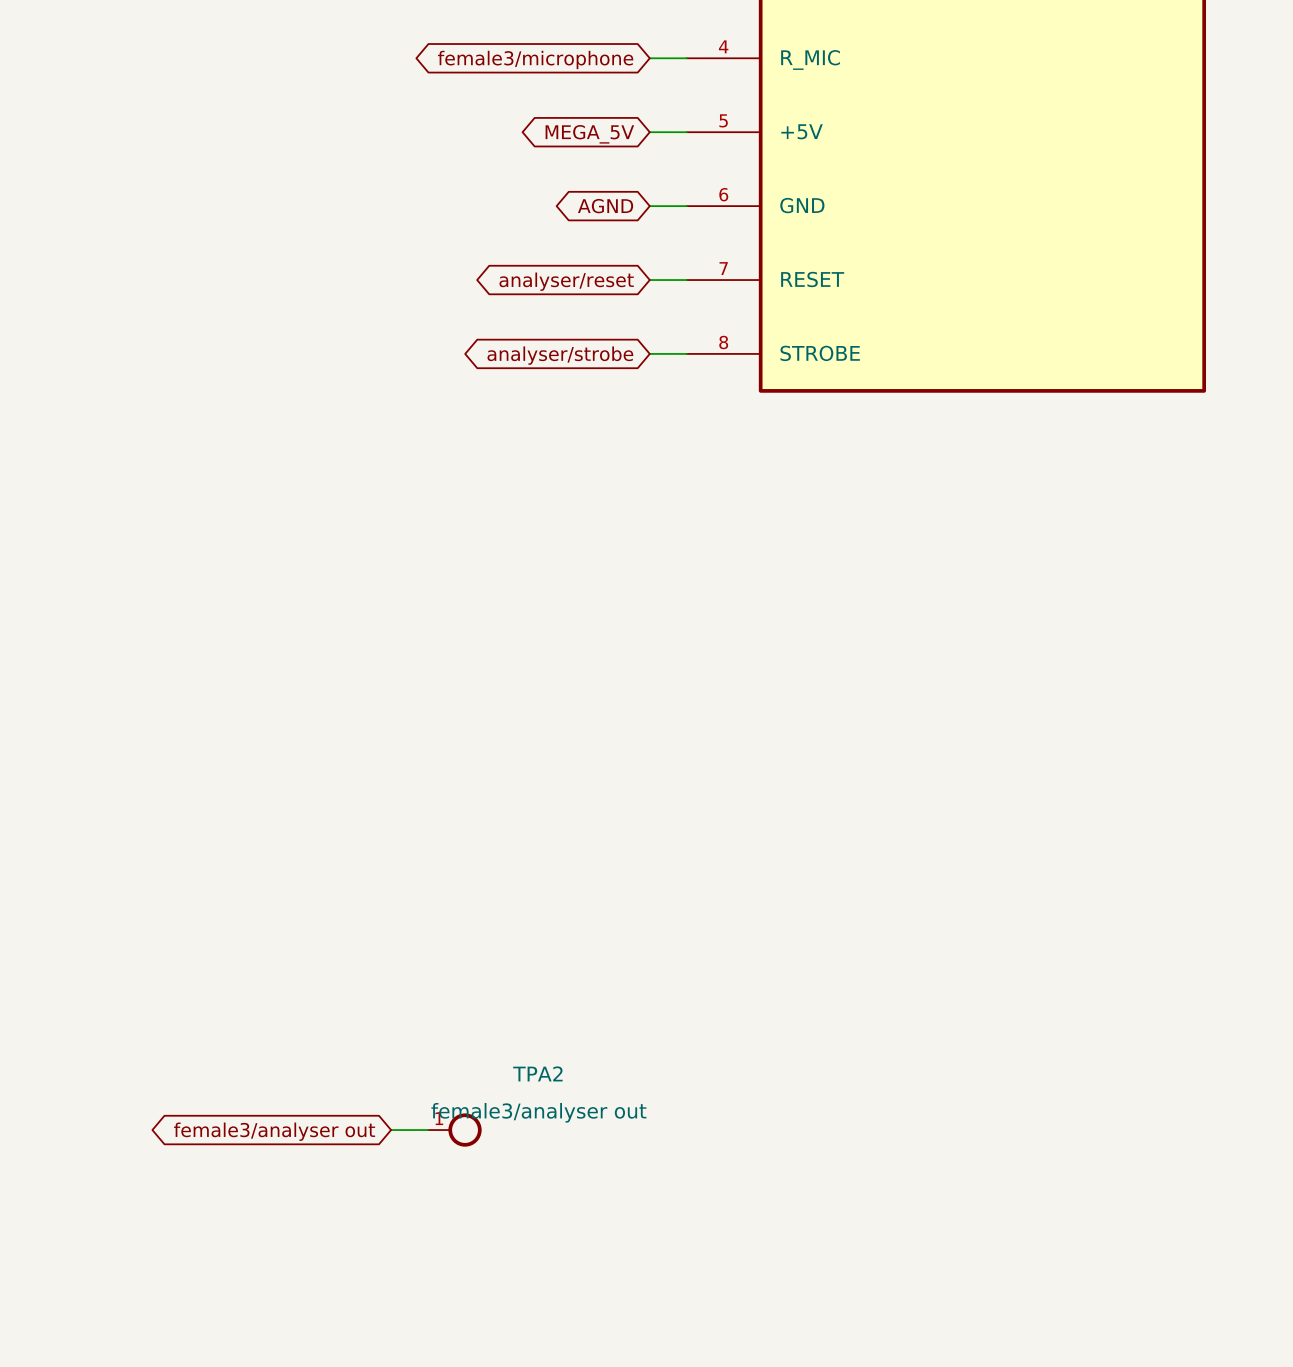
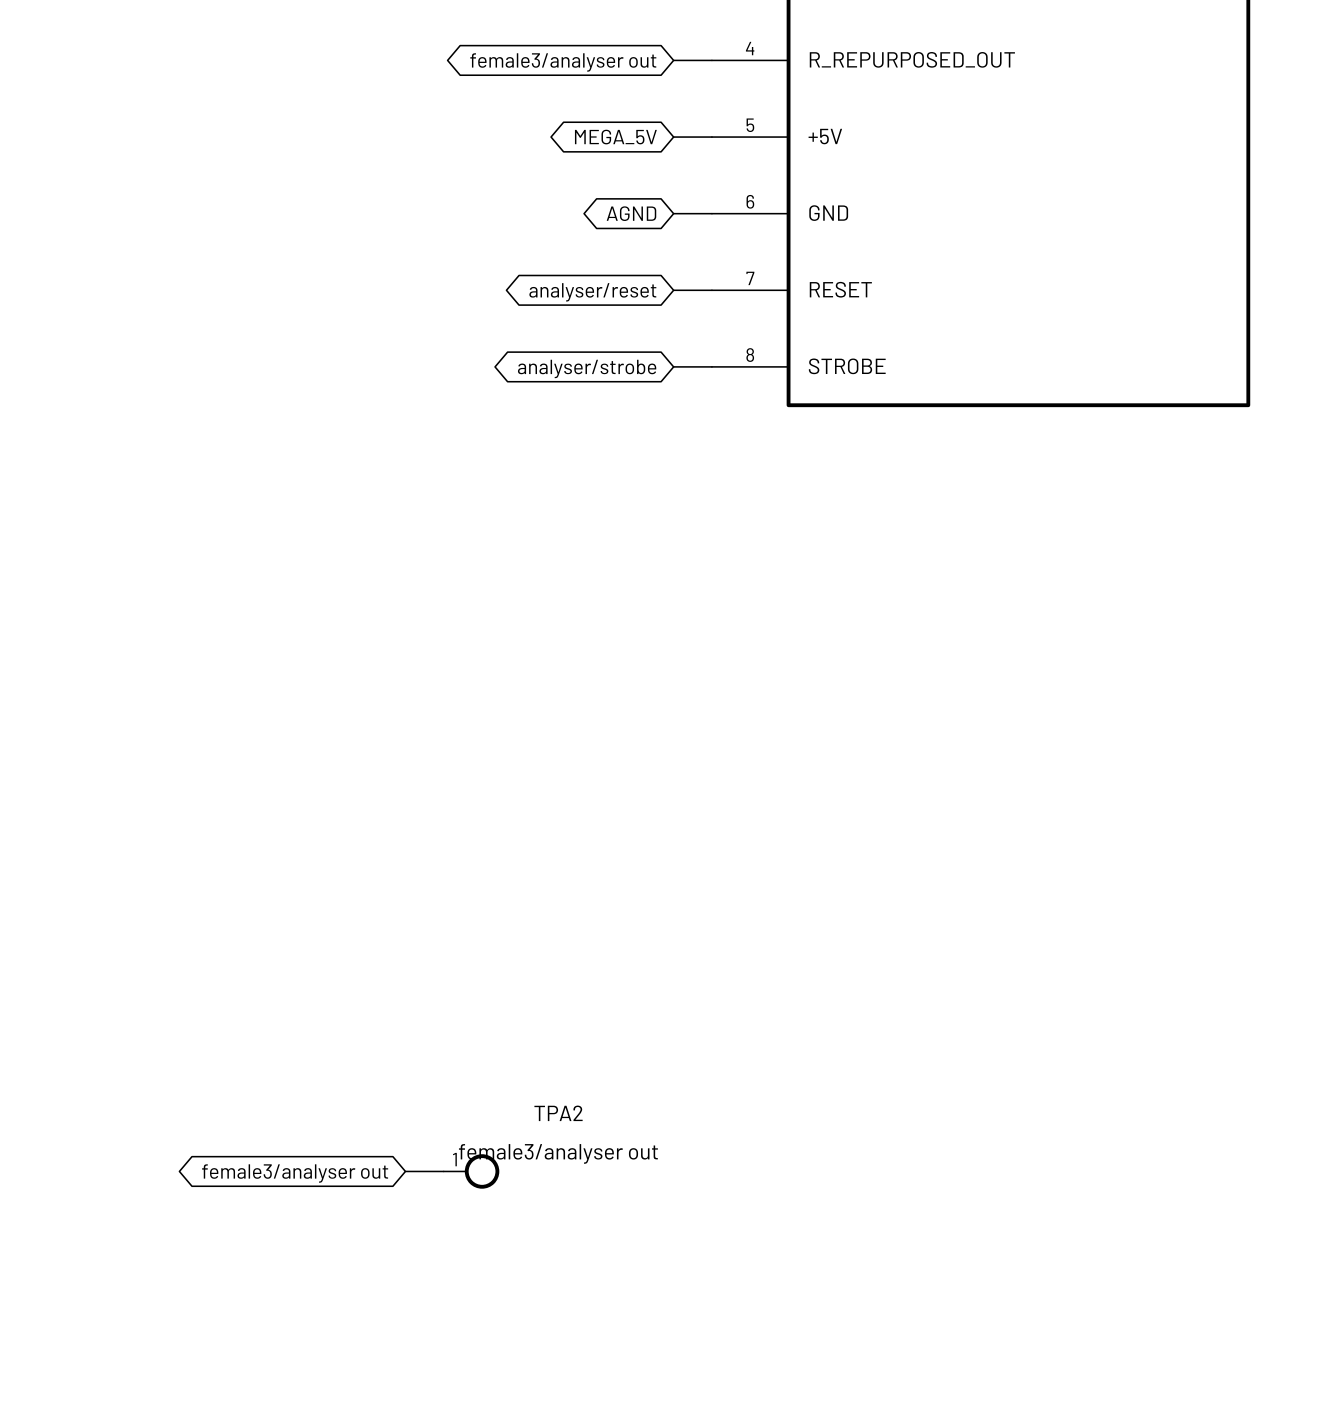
global label: female3/microphone (535, 59) -> female3/analyser out (563, 62)
part pin name: R_MIC (810, 59) -> R_REPURPOSED_OUT (912, 59)

